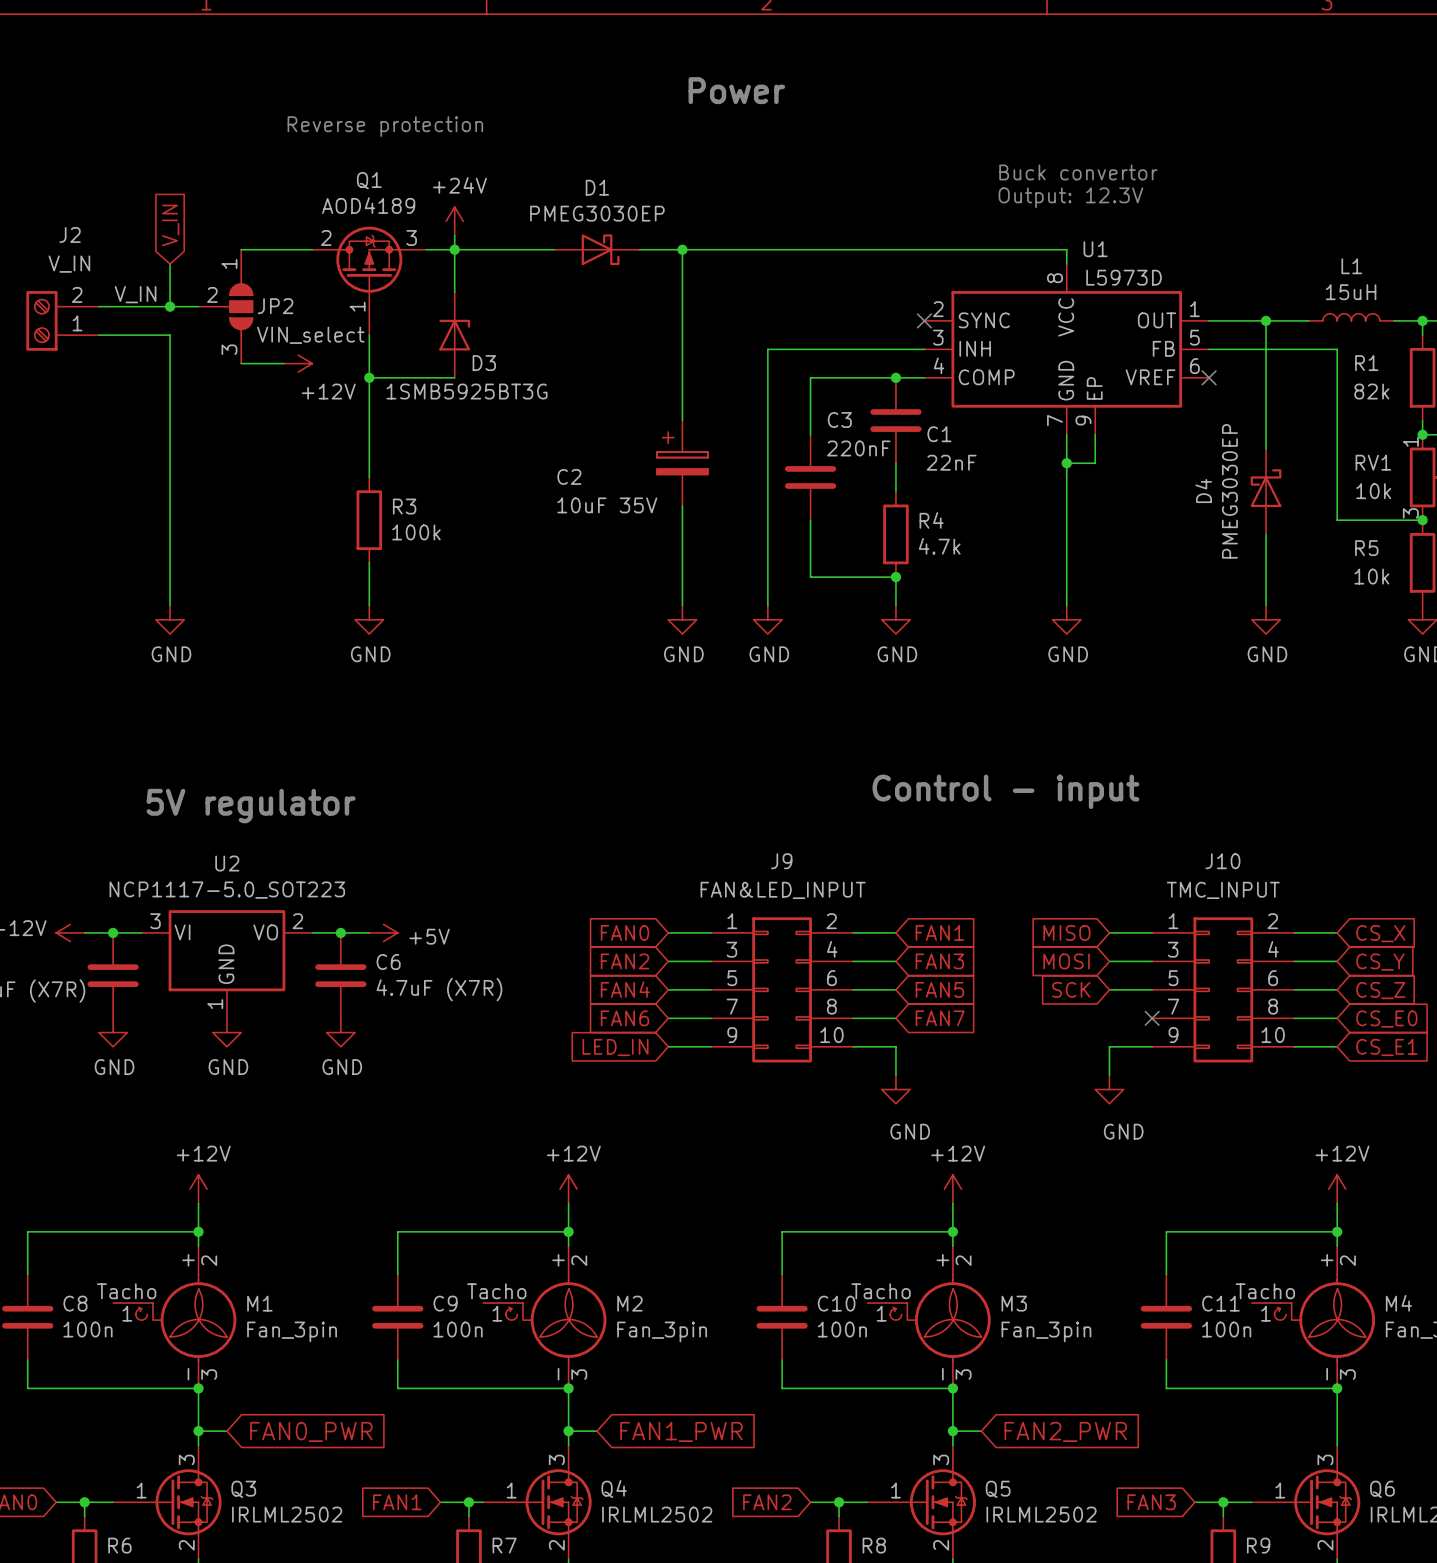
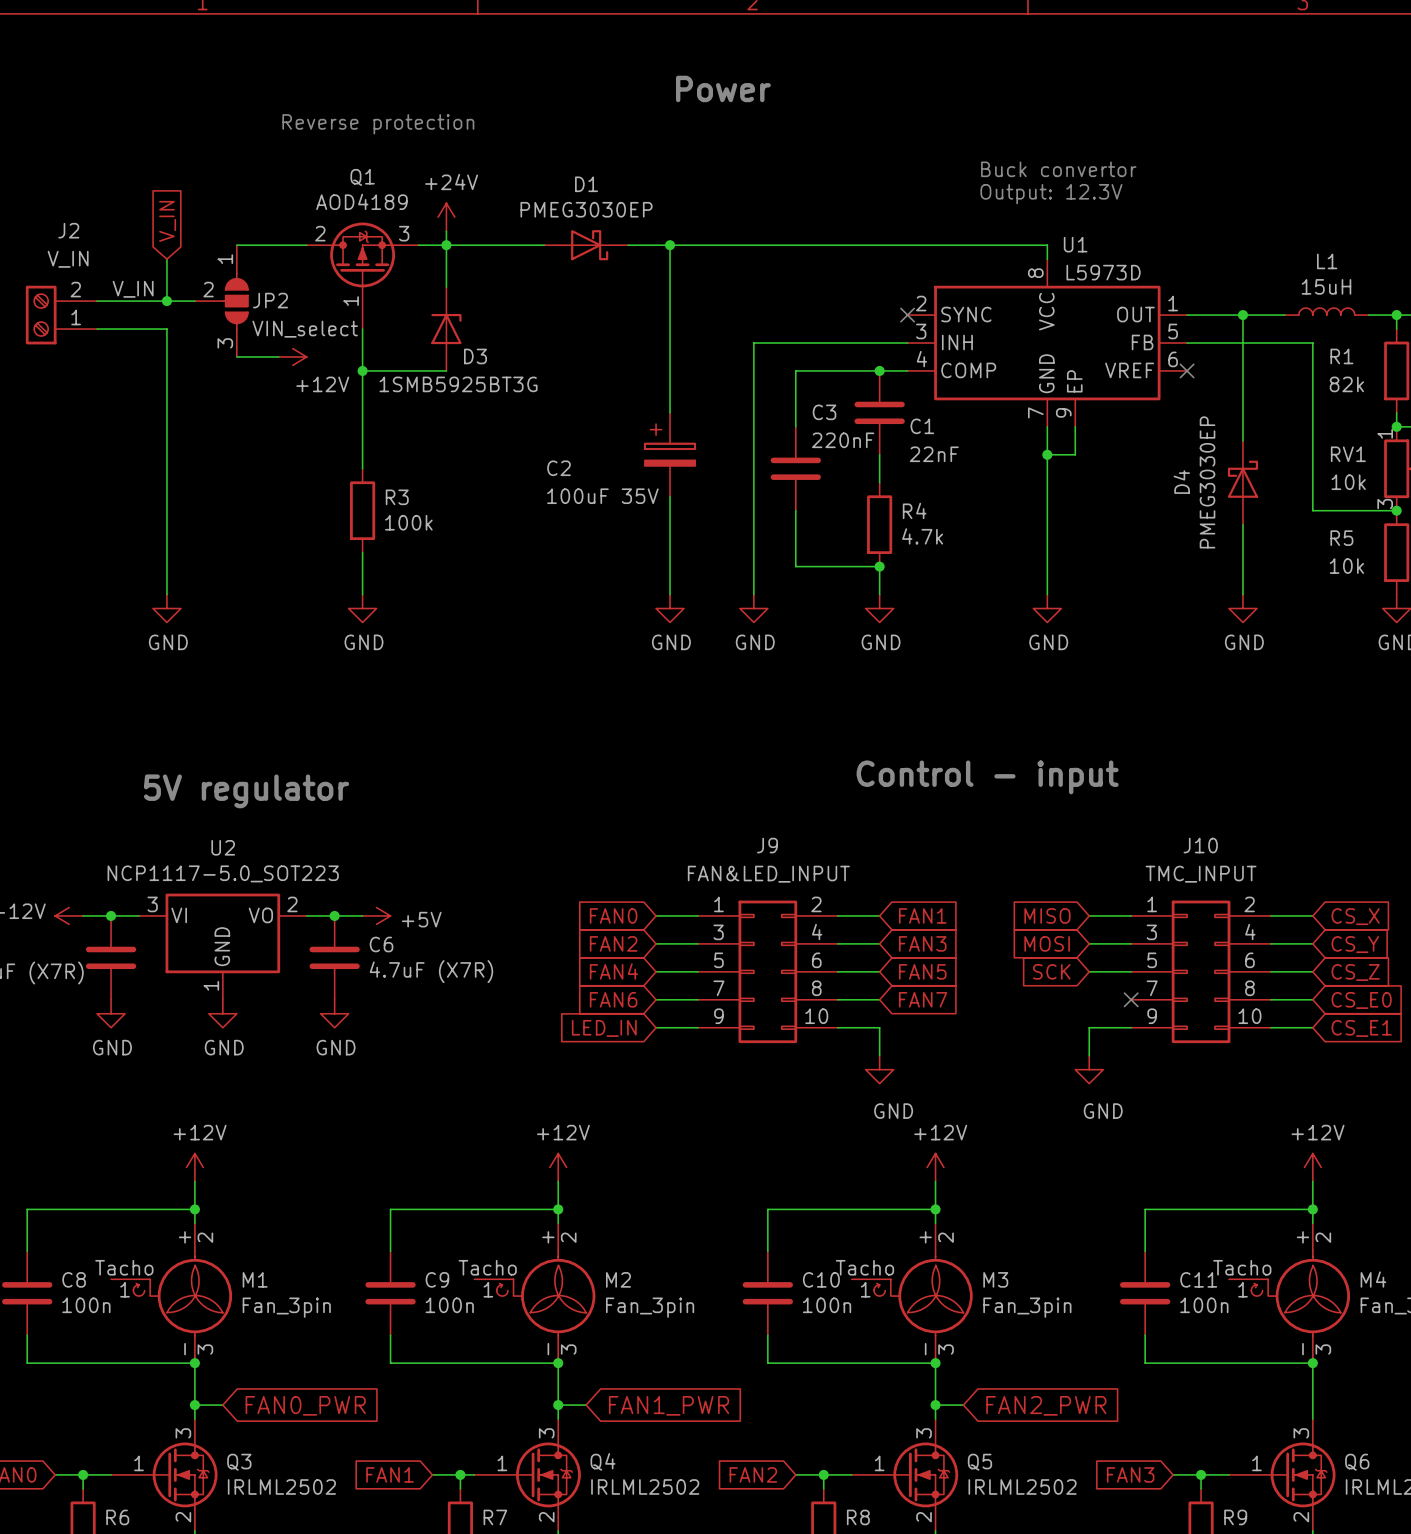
C2 value: 10uF 35V (607, 505) -> 100uF 35V (602, 496)

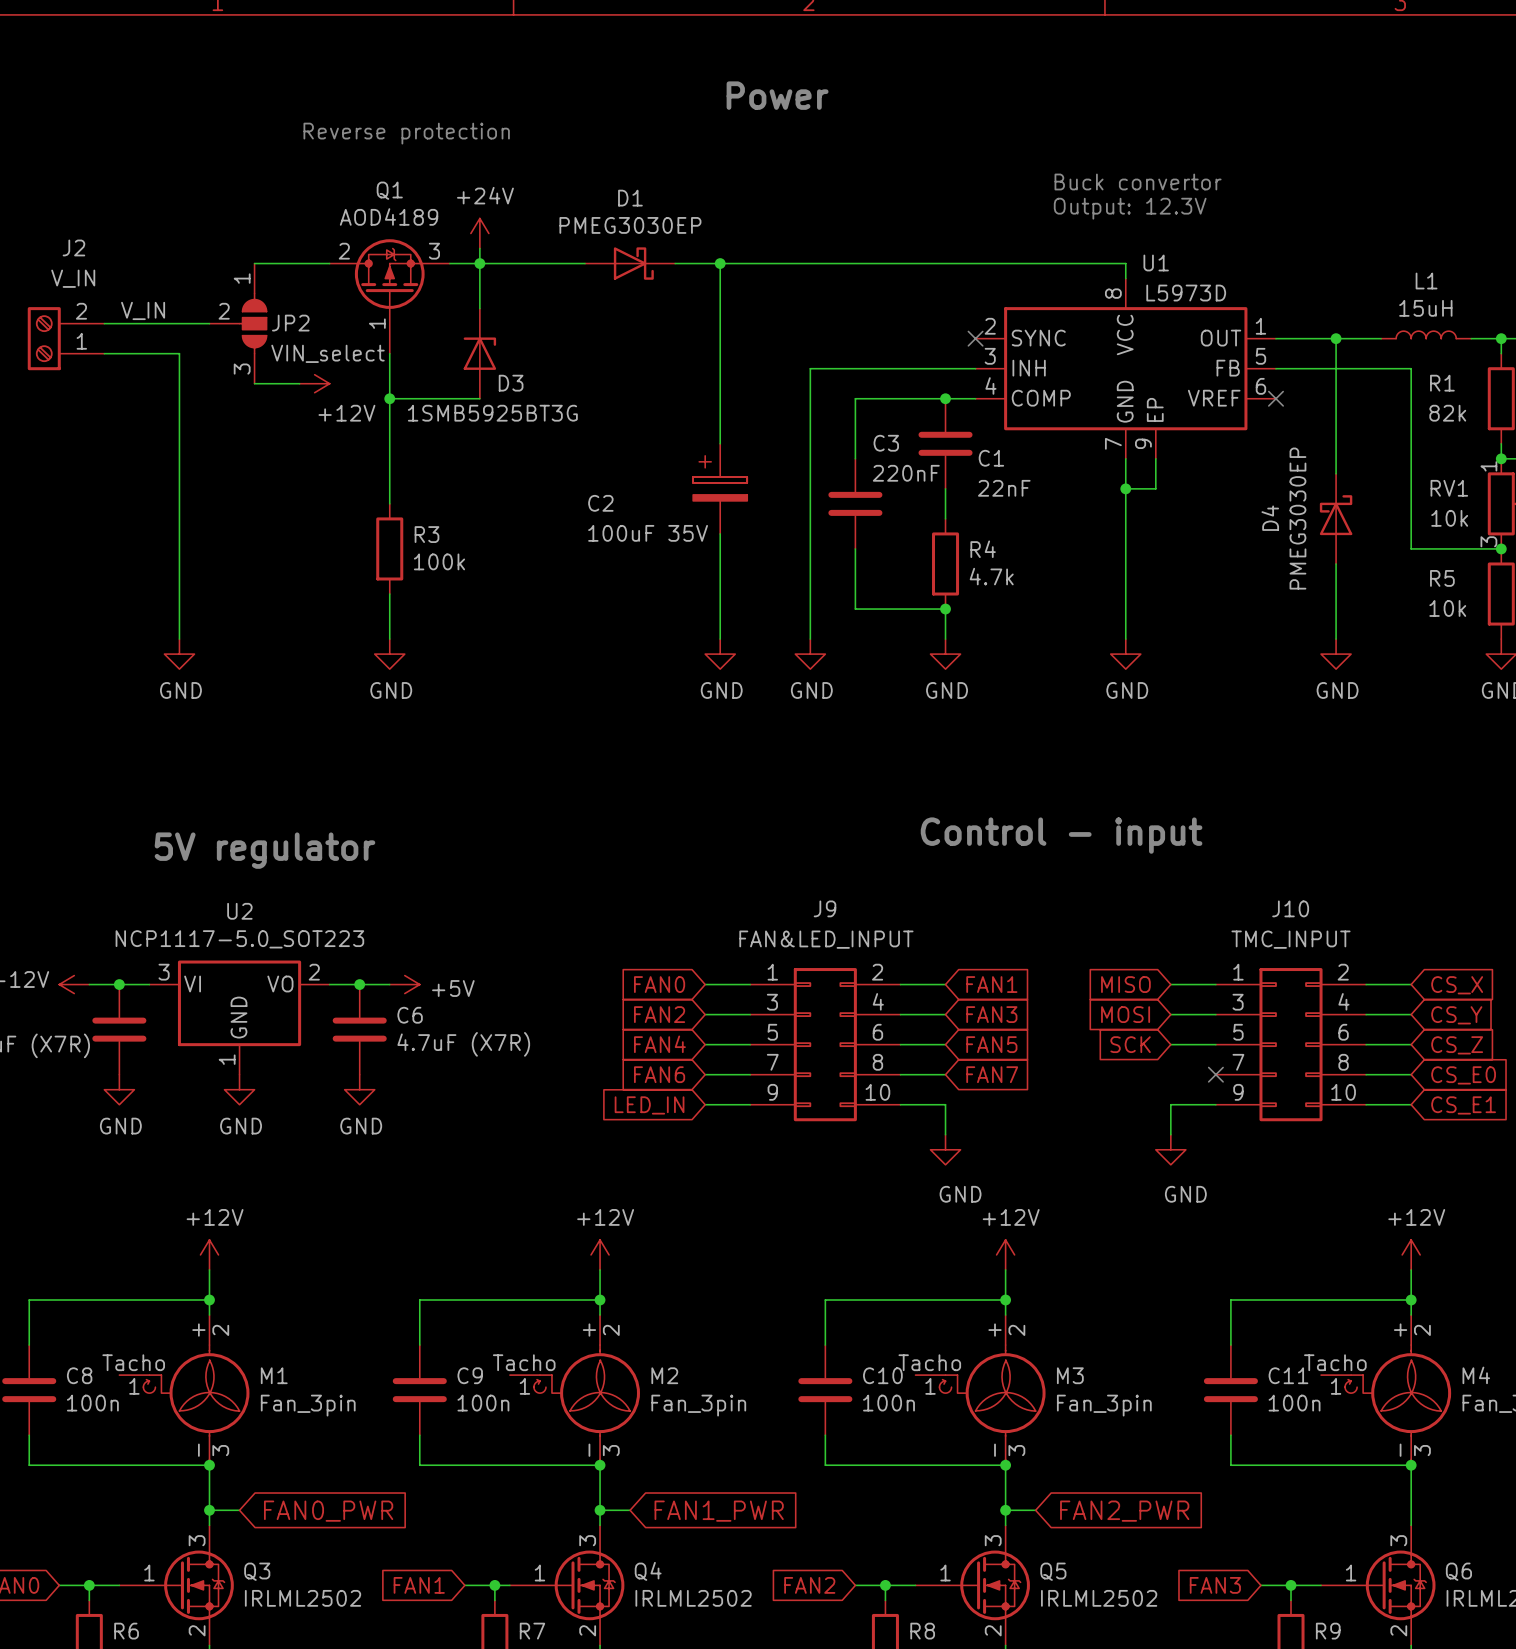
global label: V_IN (167, 221) -> none
wire: (166, 259) (166, 301) -> none
junction: (166, 301) -> none

